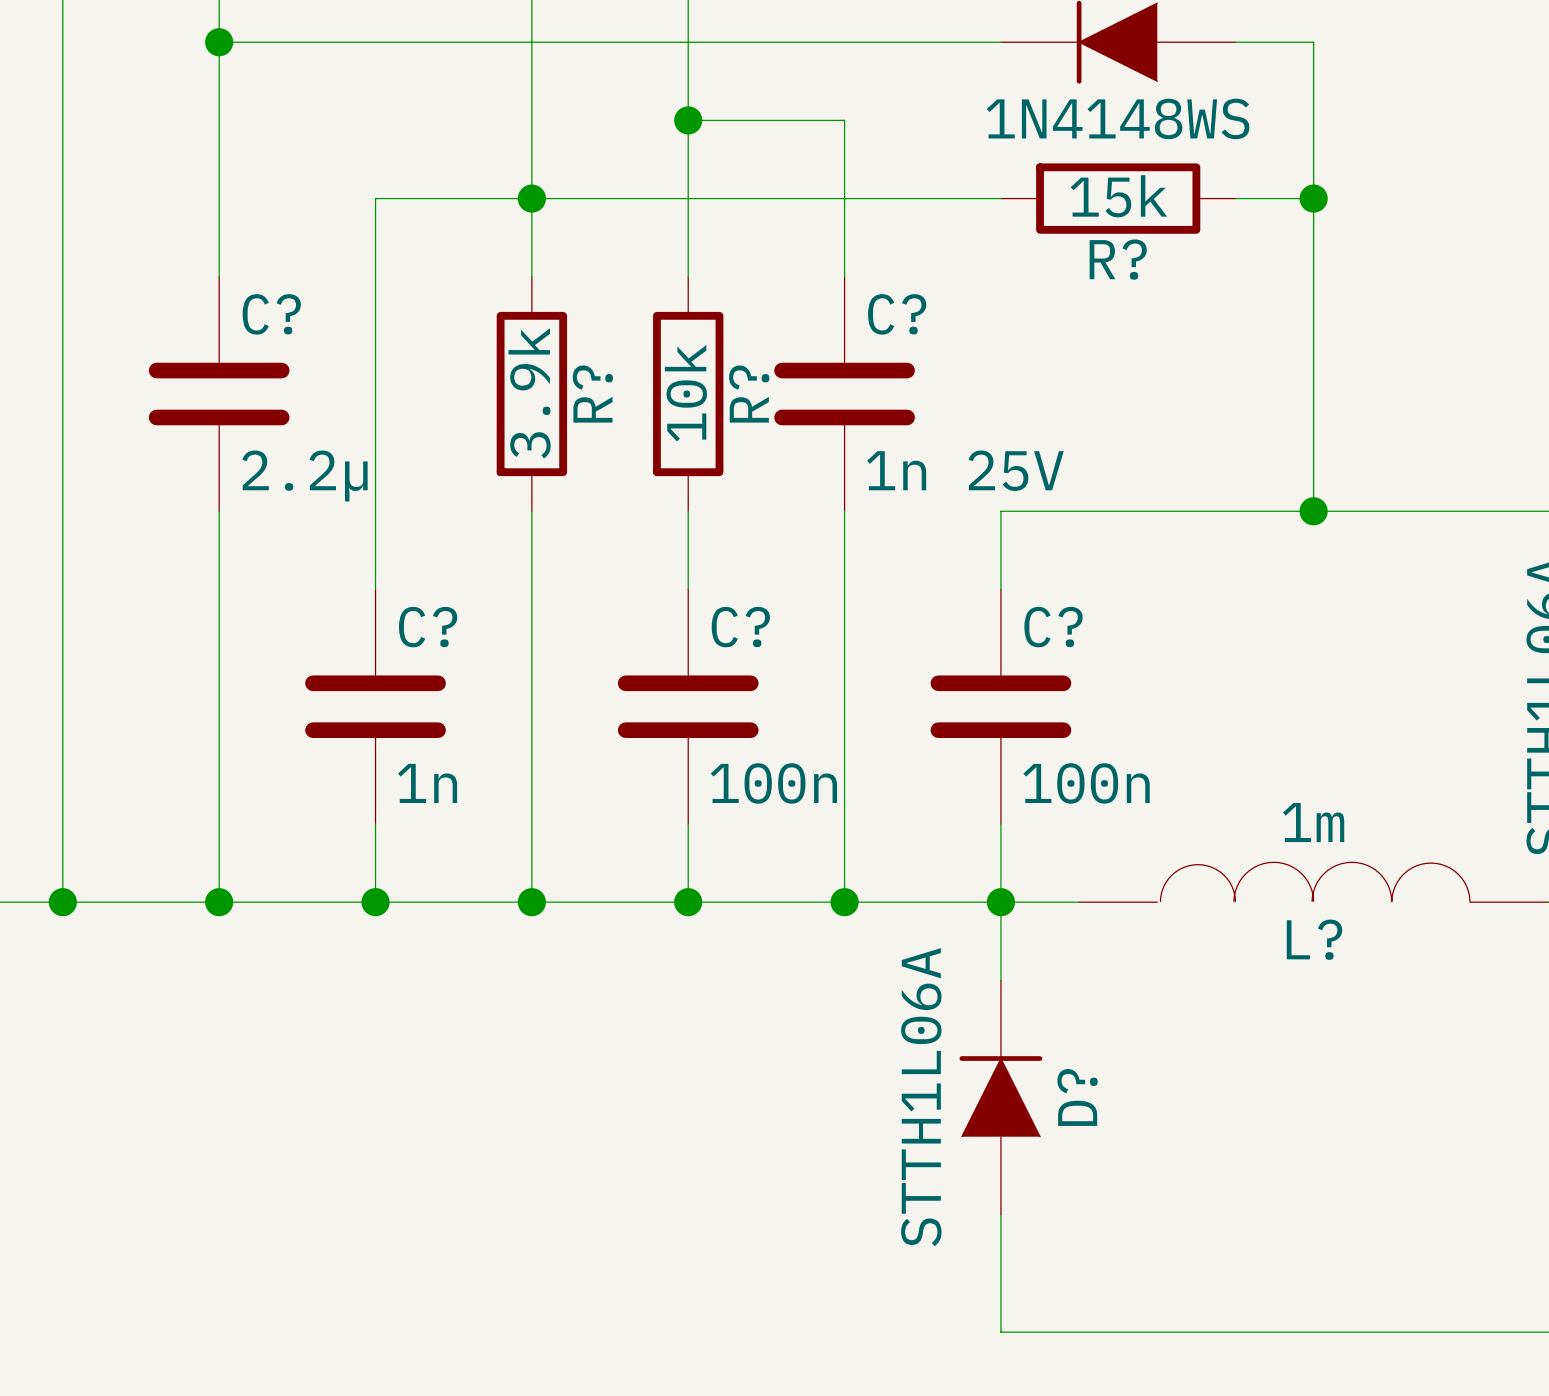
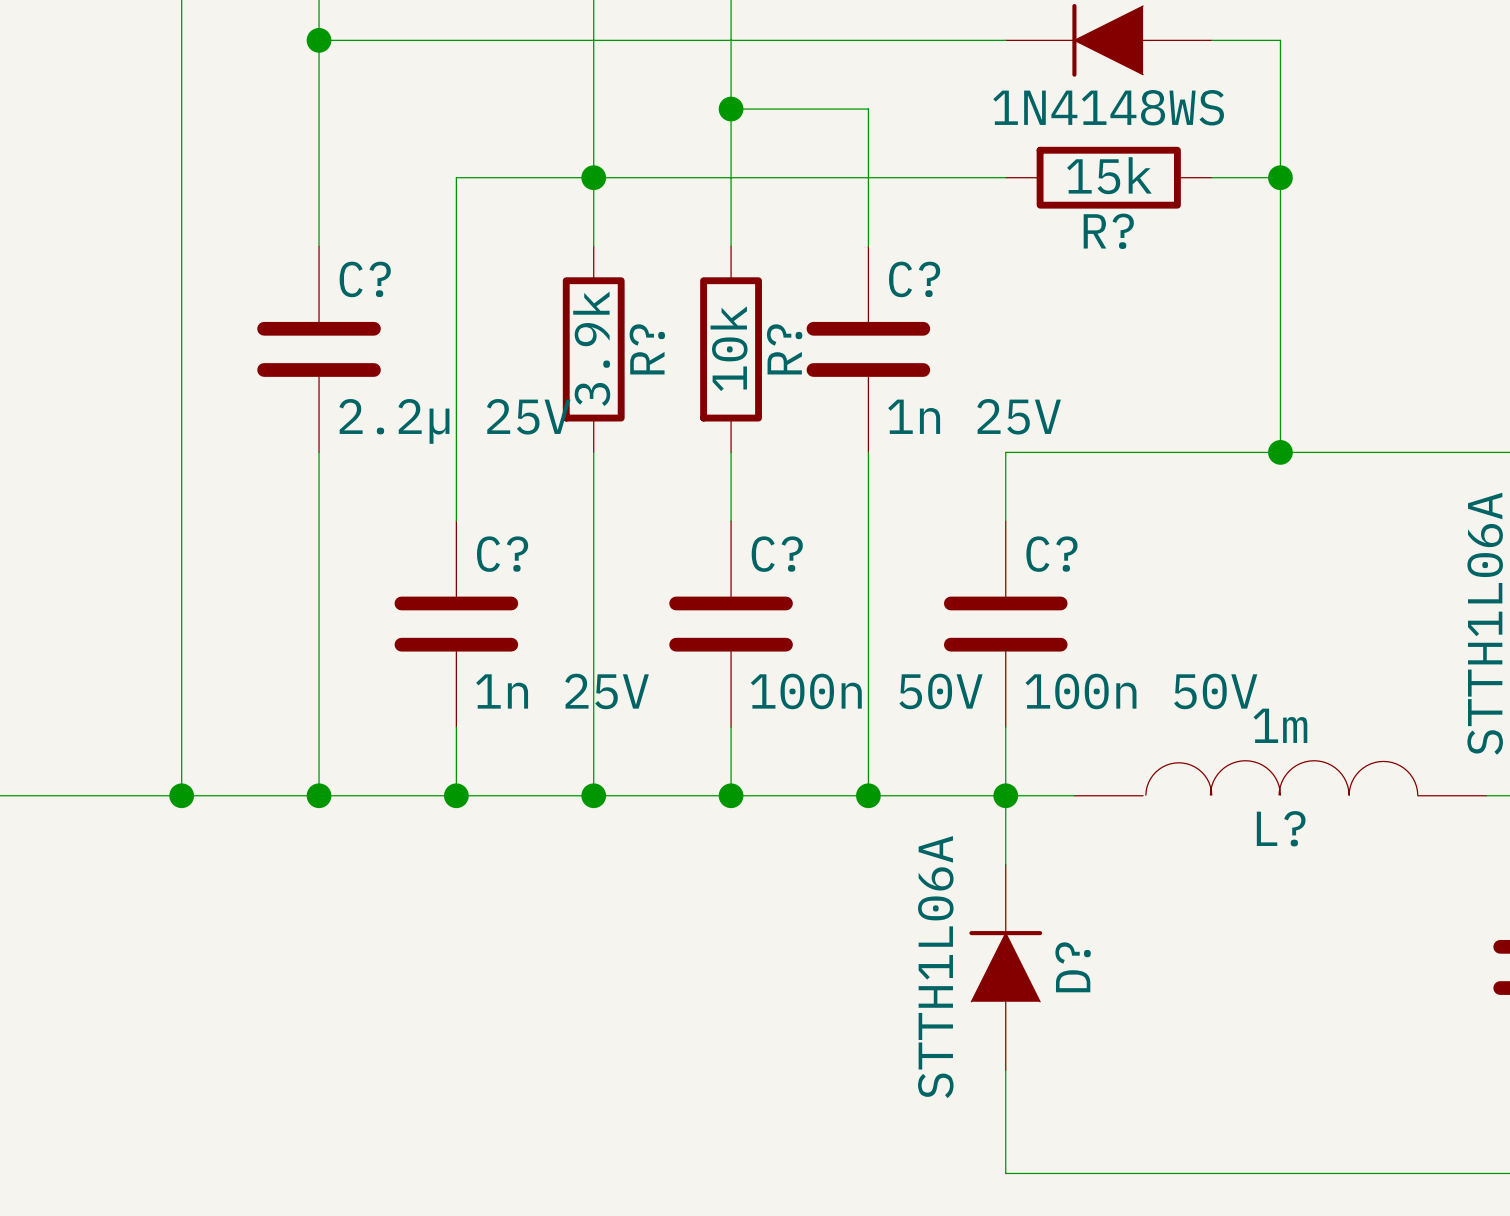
C? value: 2.2µ (304, 476) -> 2.2µ 25V (454, 421)
C? value: 1n (427, 783) -> 1n 25V (562, 691)
C? value: 100n (773, 783) -> 100n 50V (866, 691)
C? value: 100n (1086, 783) -> 100n 50V (1141, 691)

